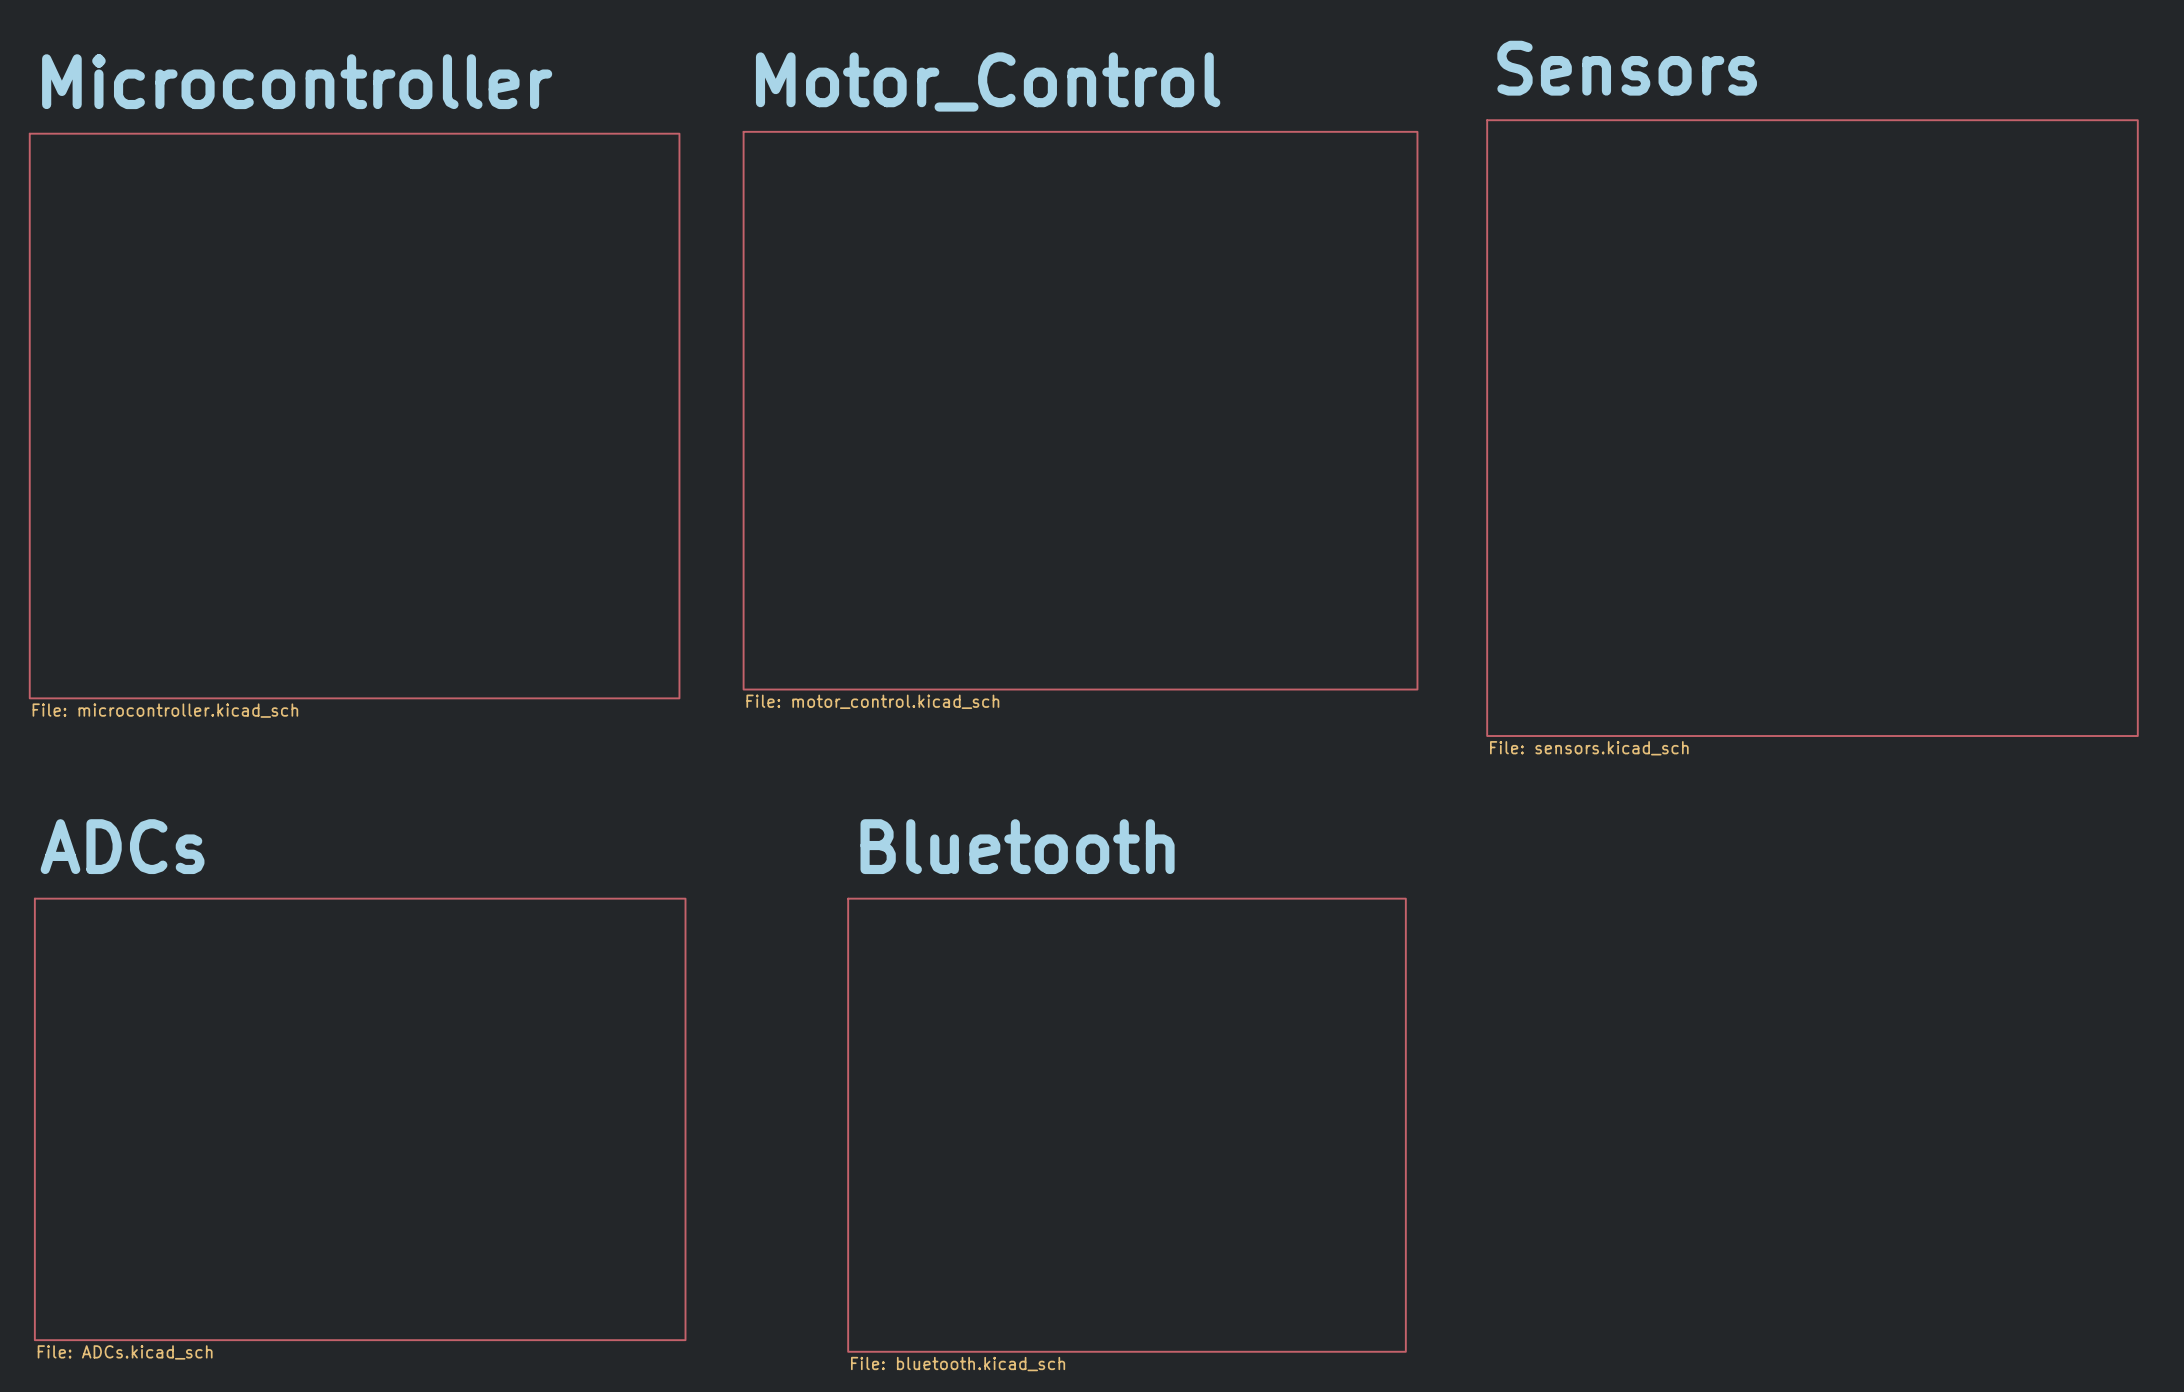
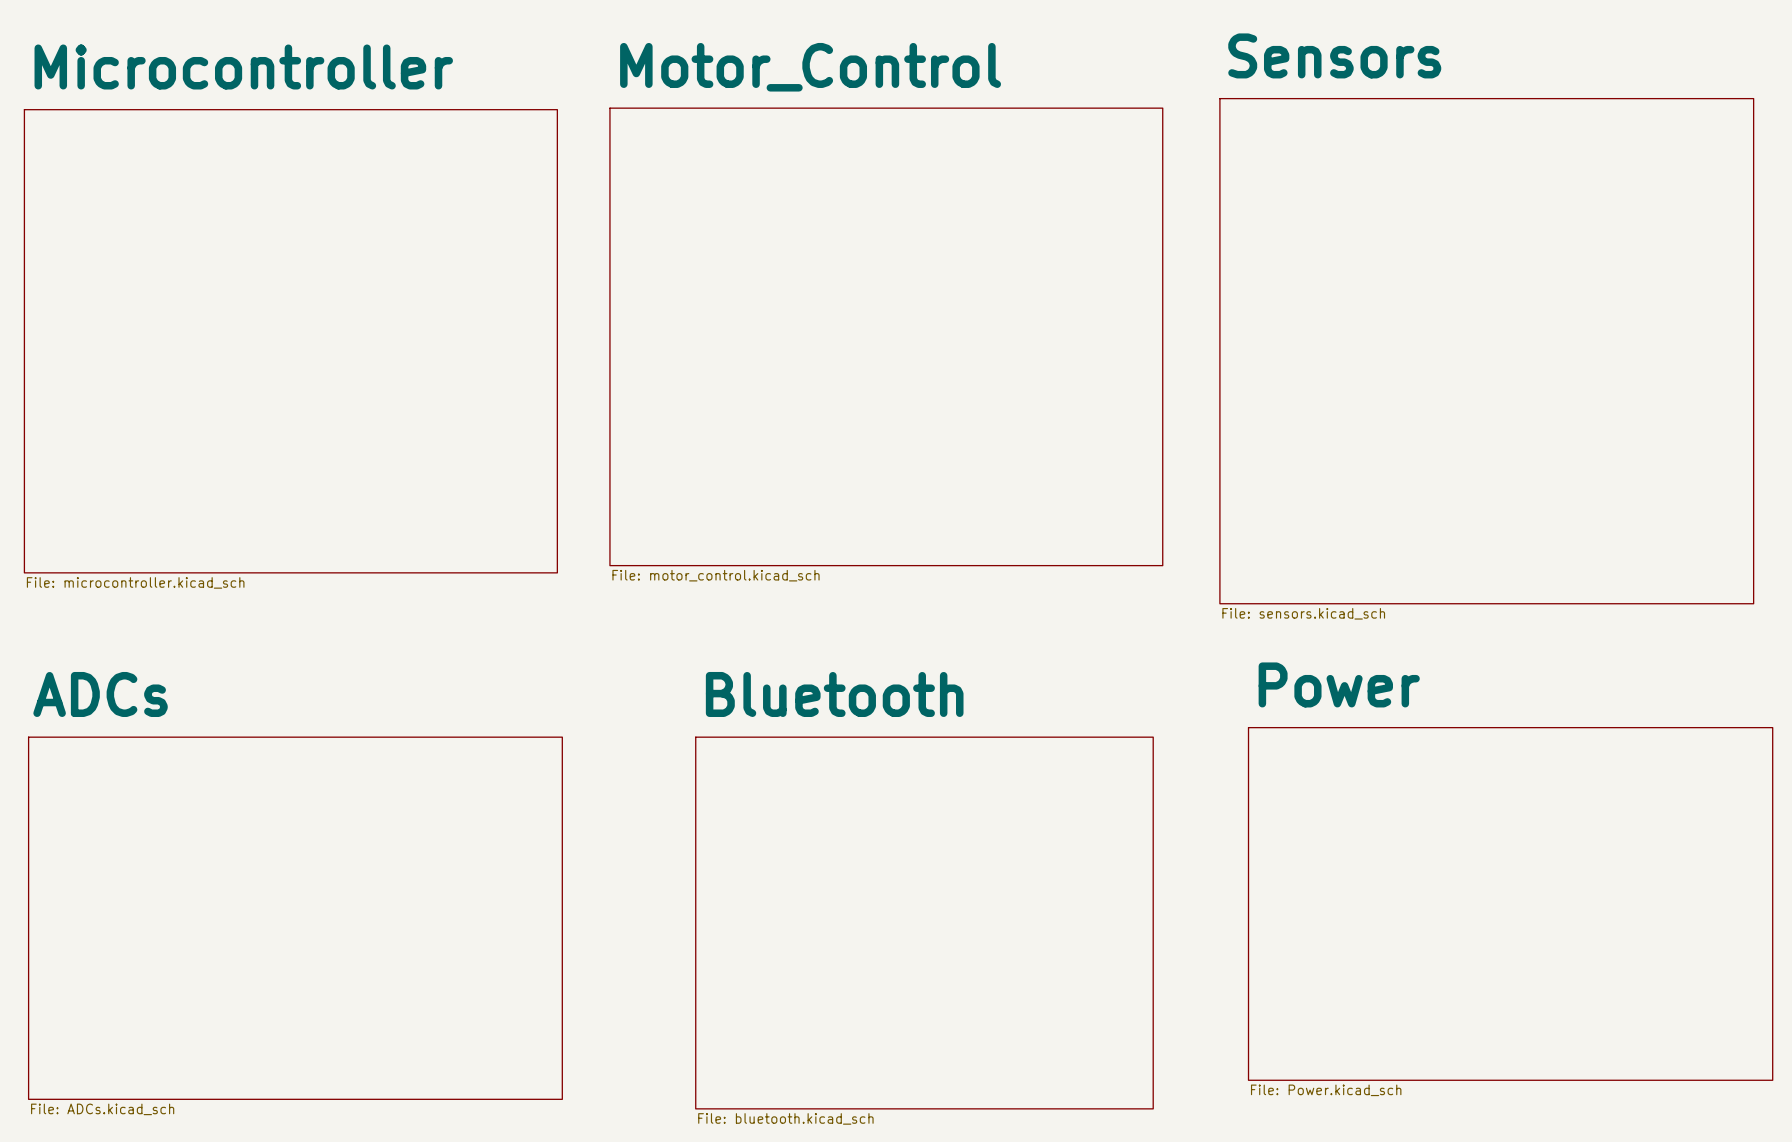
sheet Power: none -> File: Power.kicad_sch (1510, 903)

